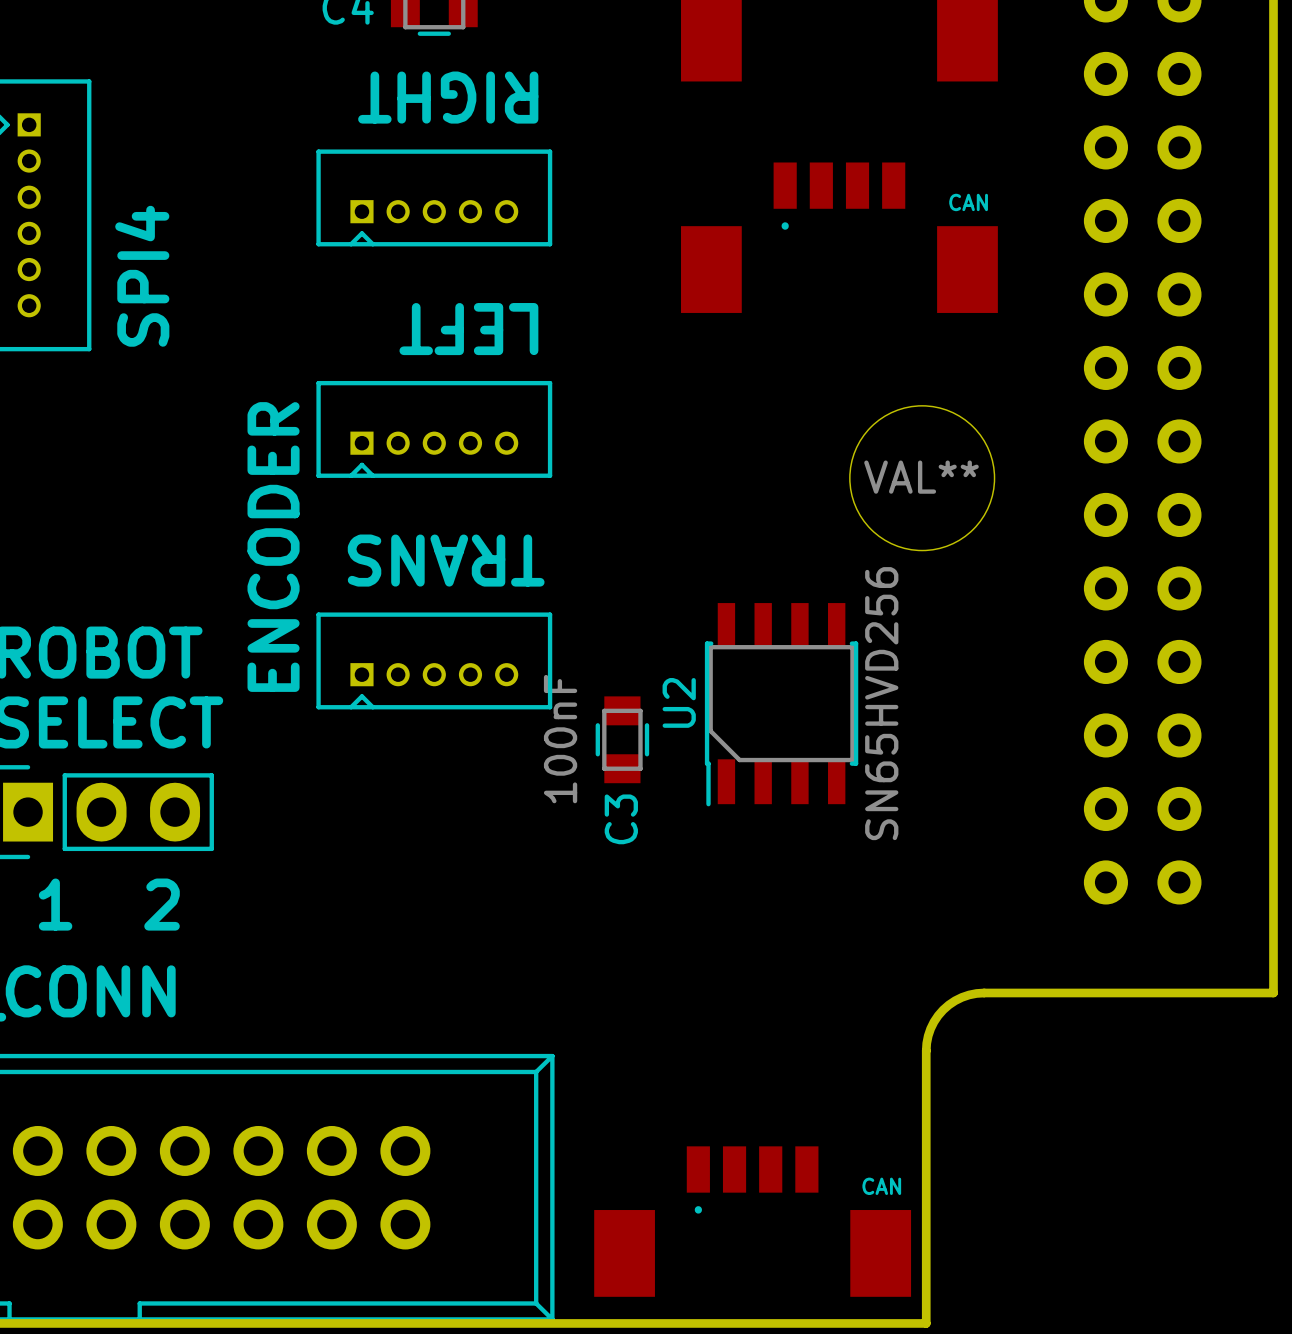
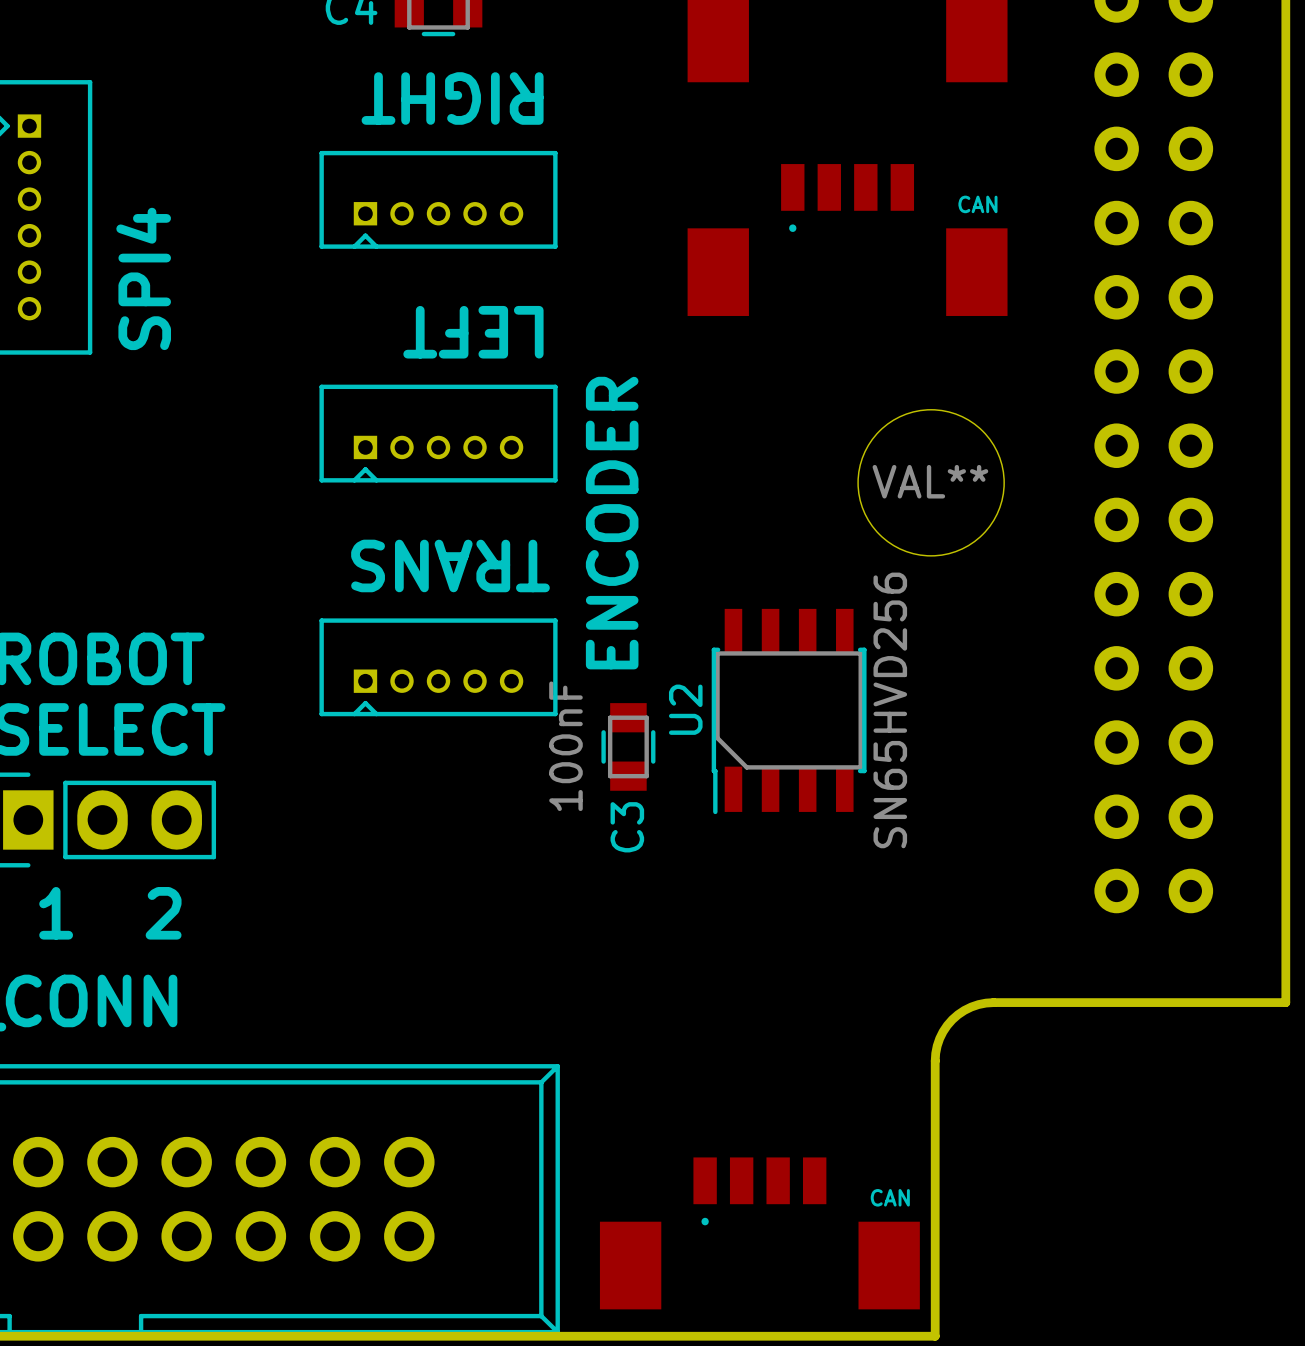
text position: ENCODER (273, 547) -> ENCODER (612, 523)

